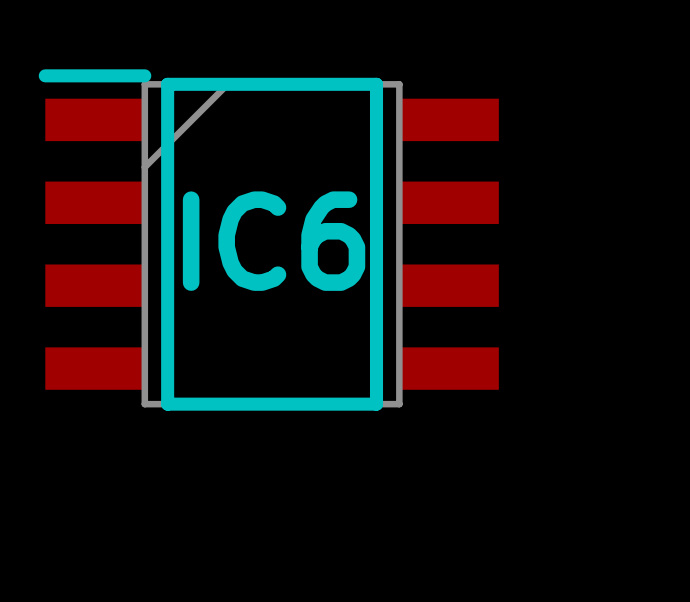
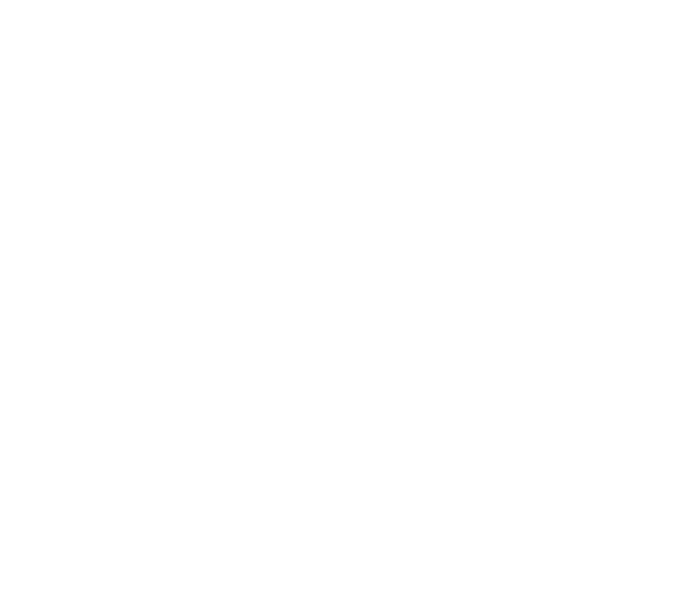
IC6: (268, 239) -> none

